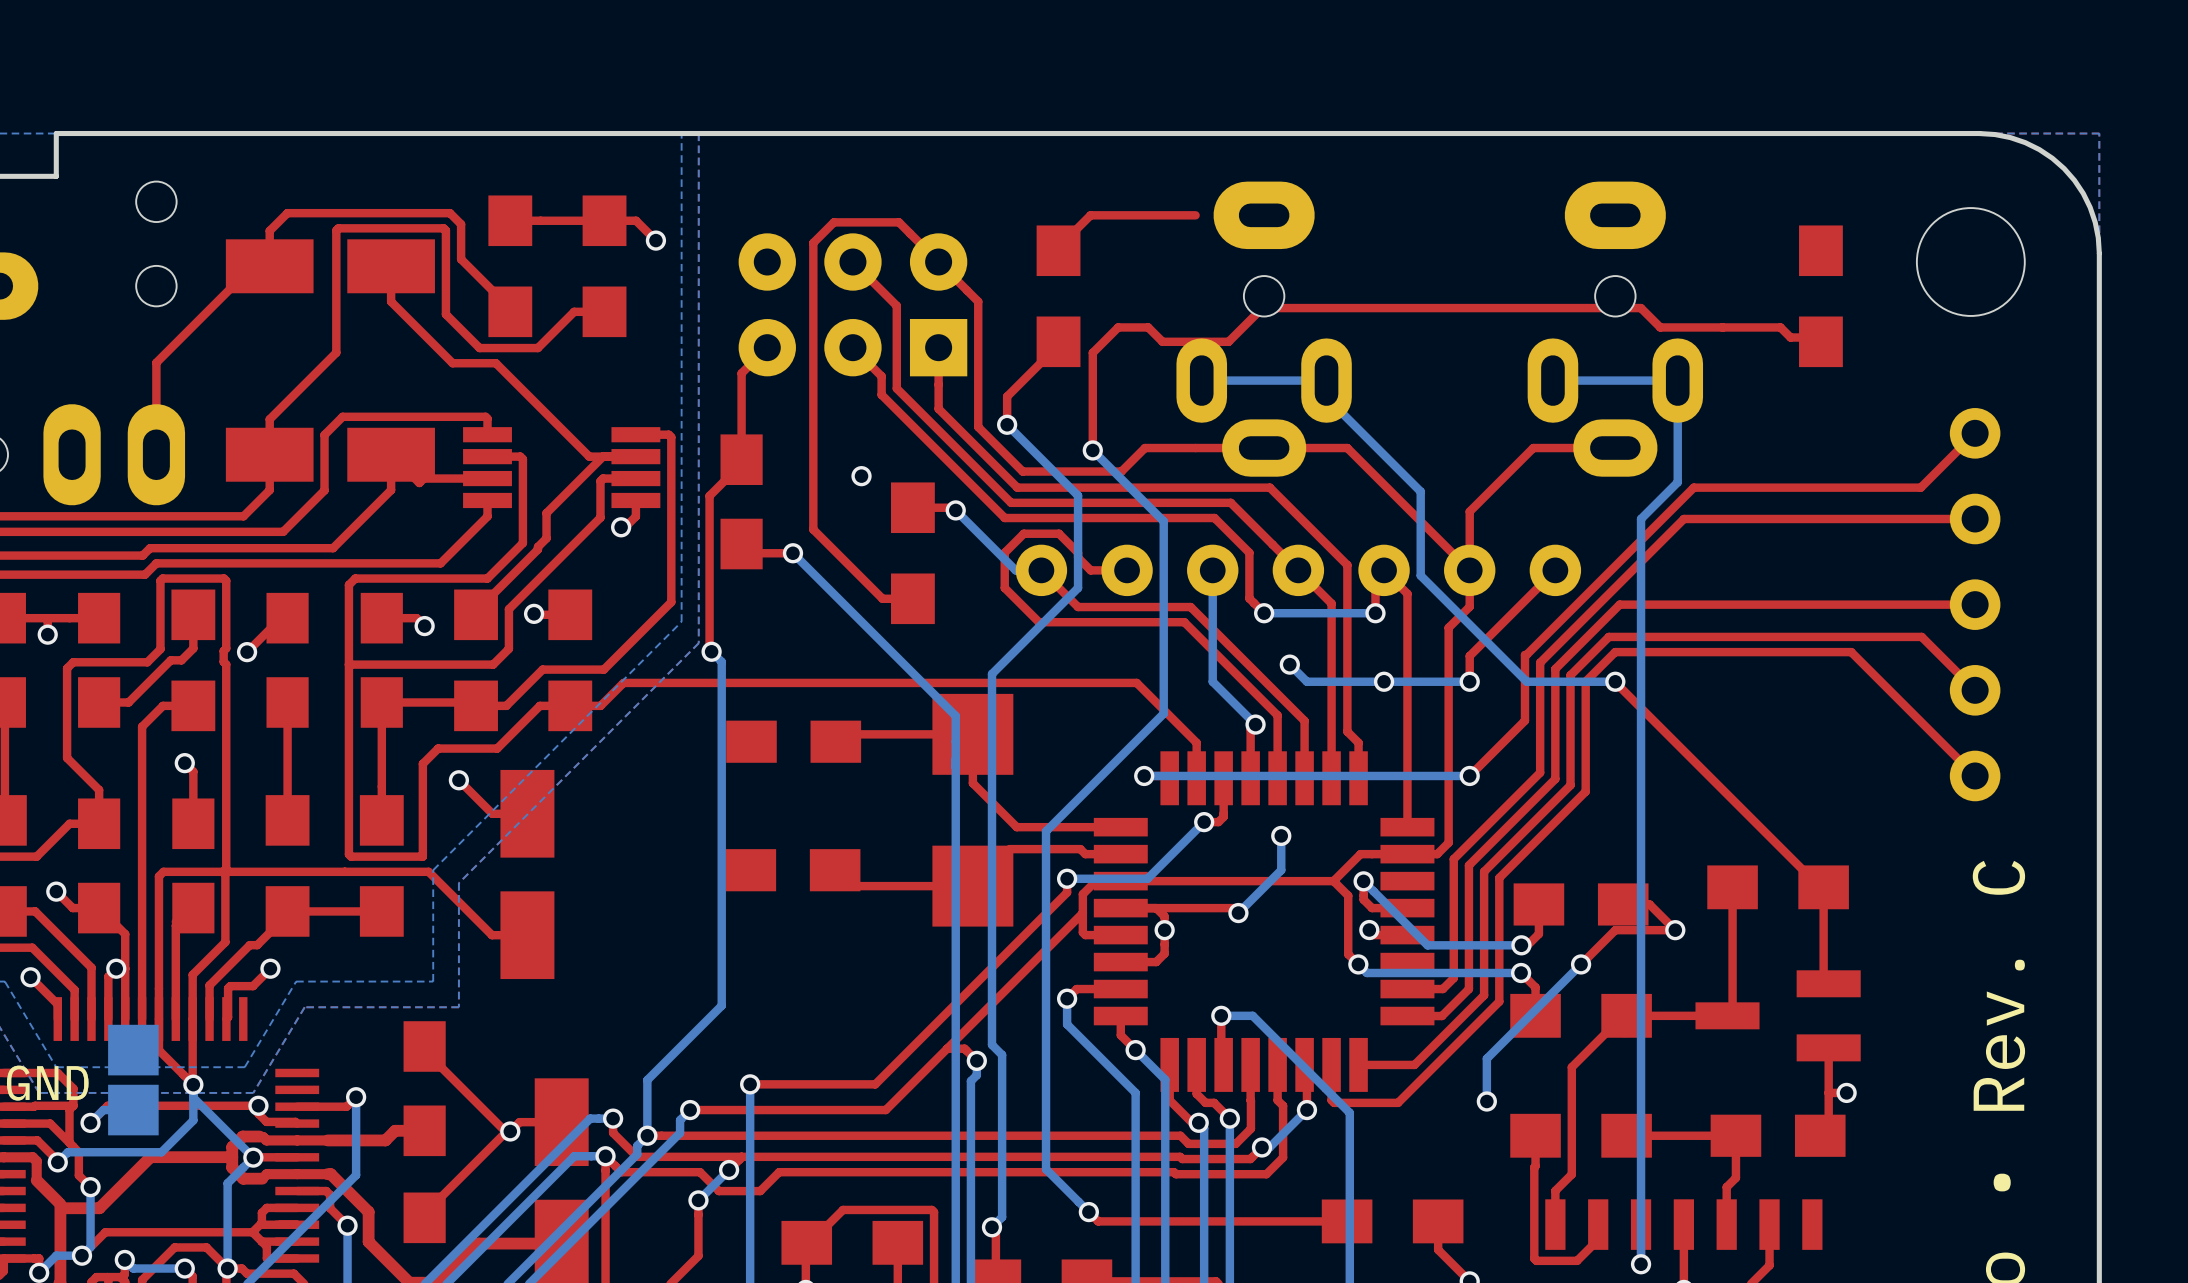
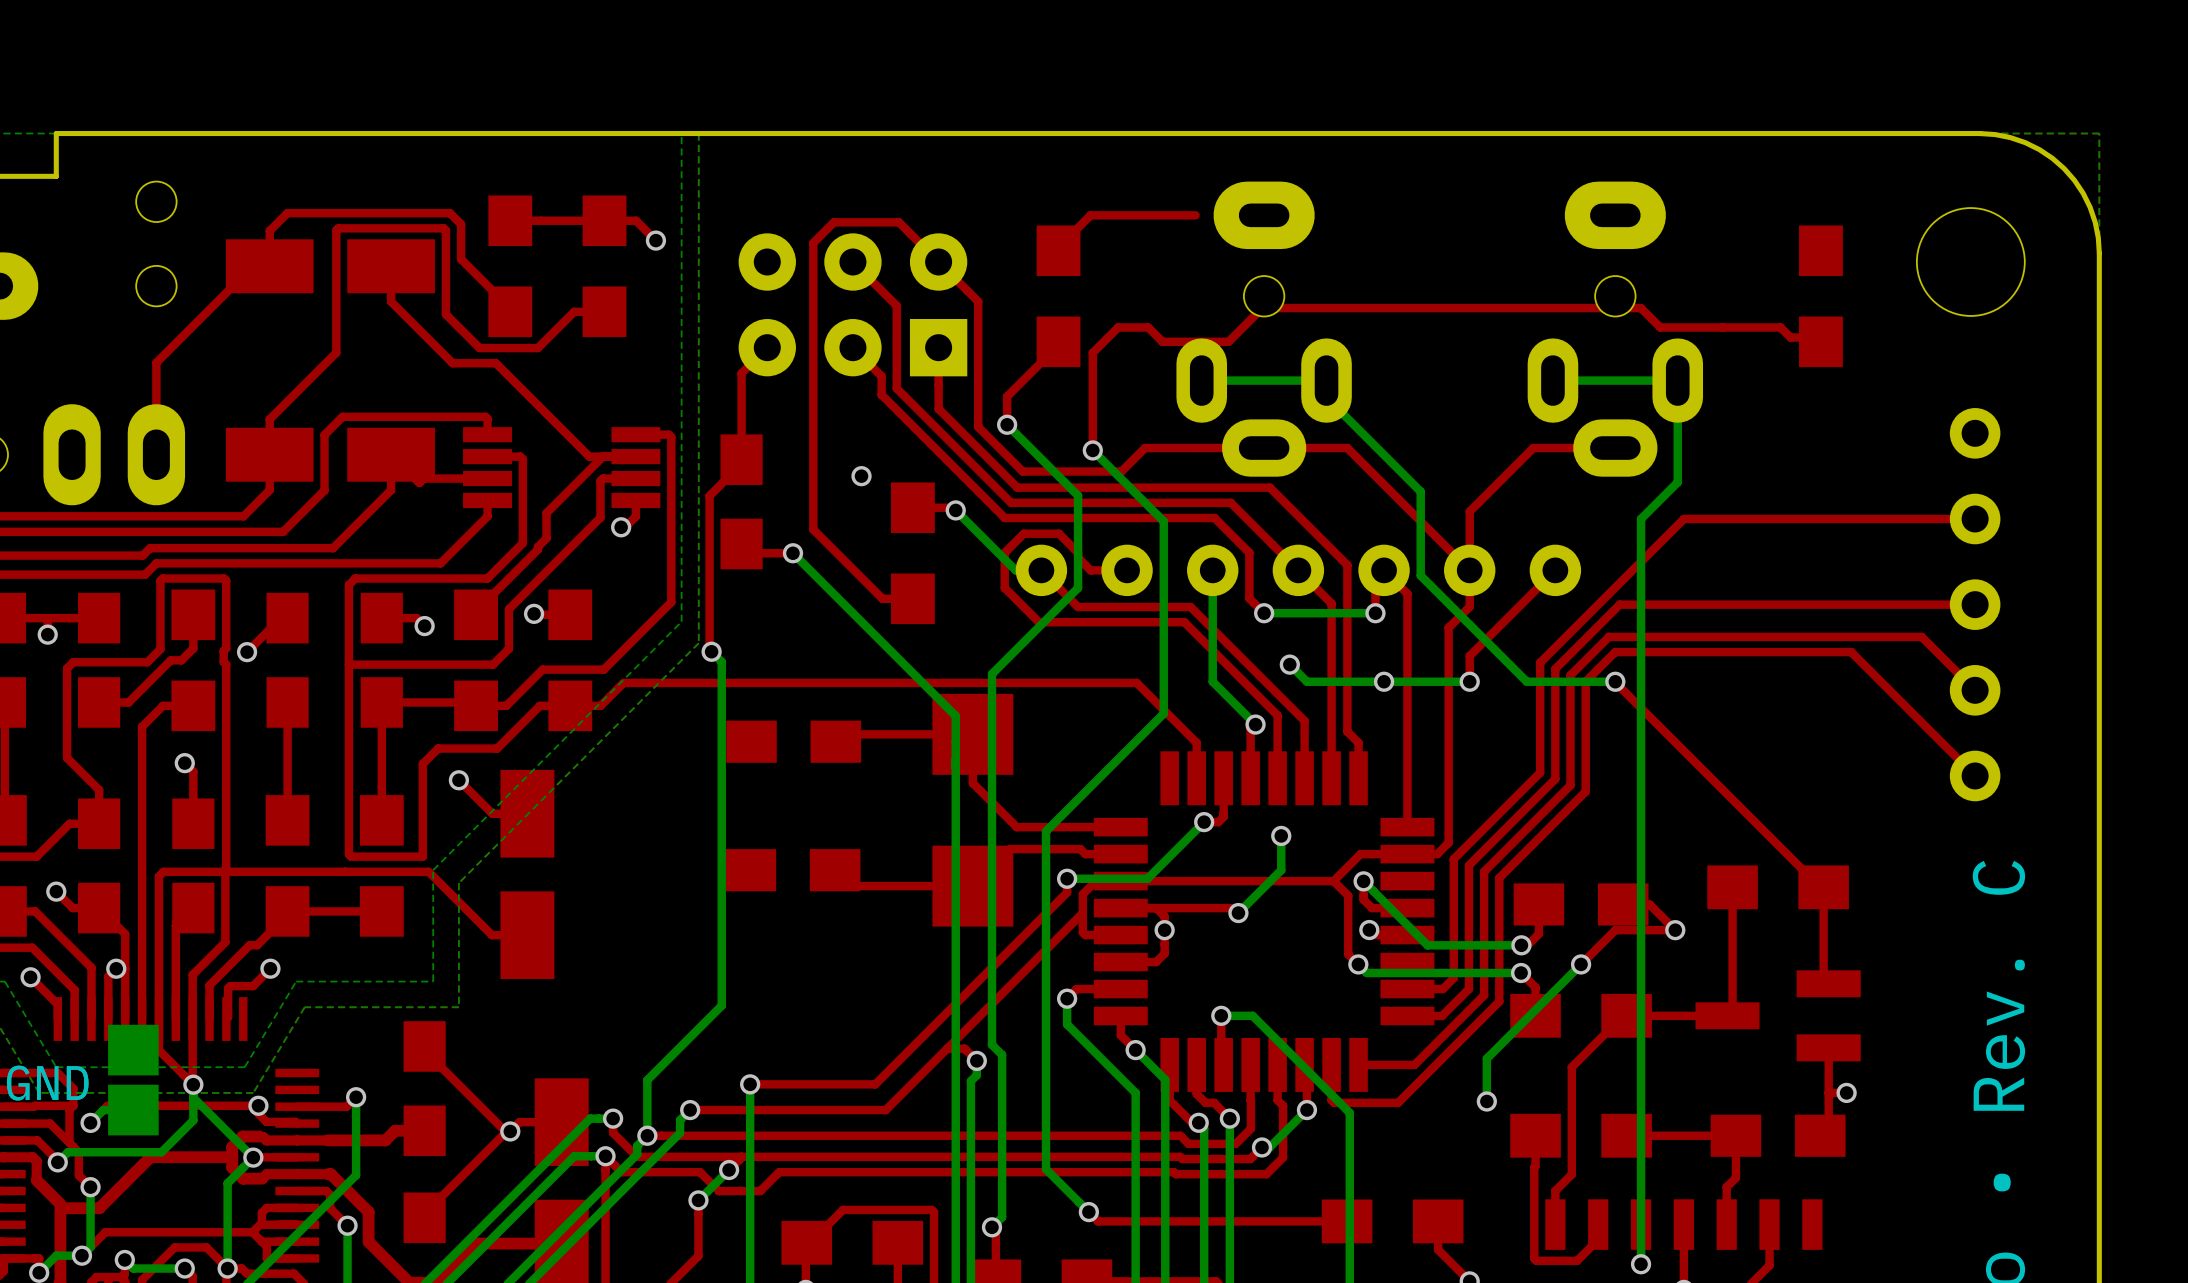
top track: (1975, 433) (1920, 487) (1693, 487) (1524, 655) (1524, 720) (1469, 775) -> none
via: (1144, 775) -> none
bottom track: (1469, 775) (1144, 775) -> none
via: (1469, 775) -> none

